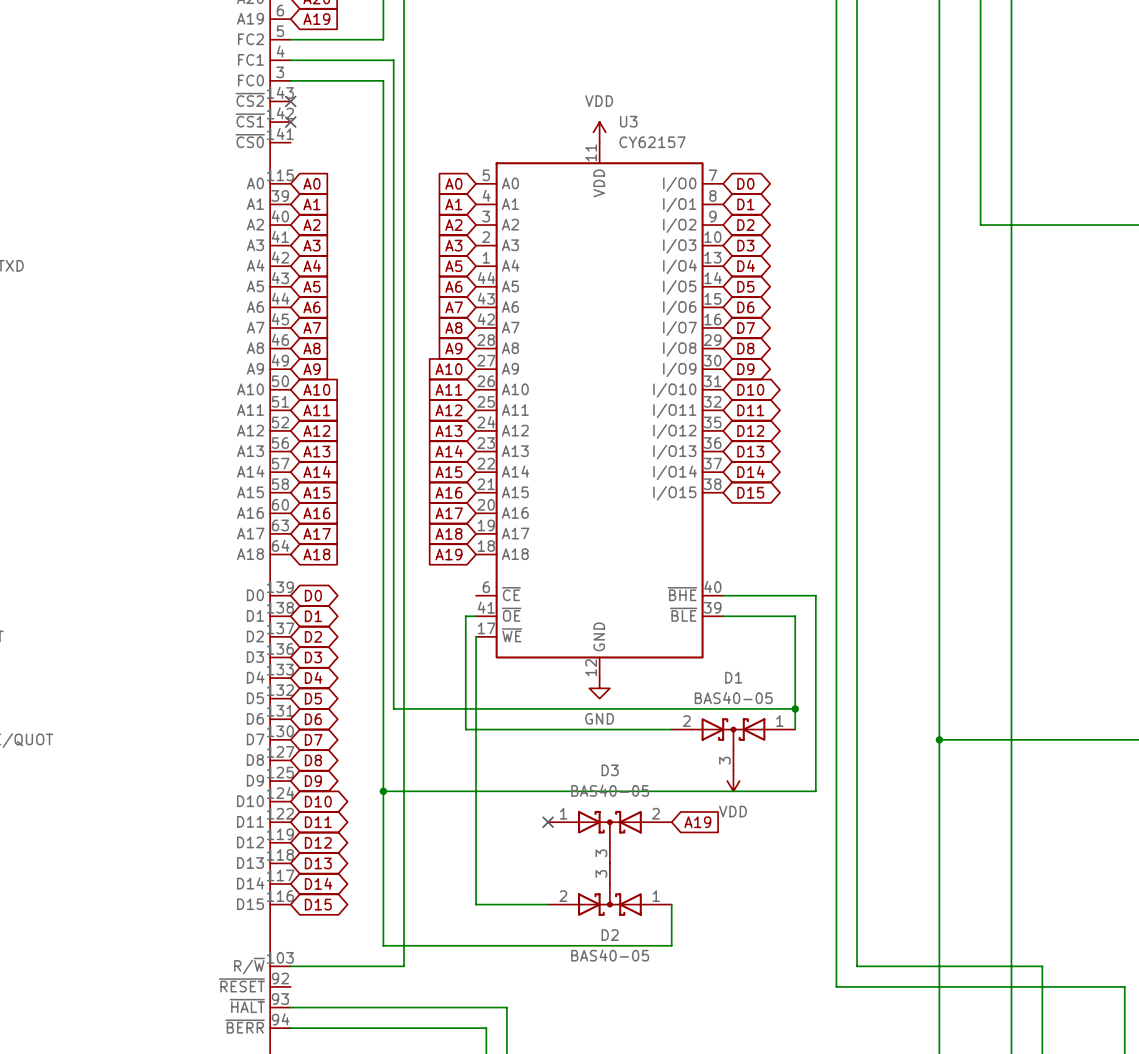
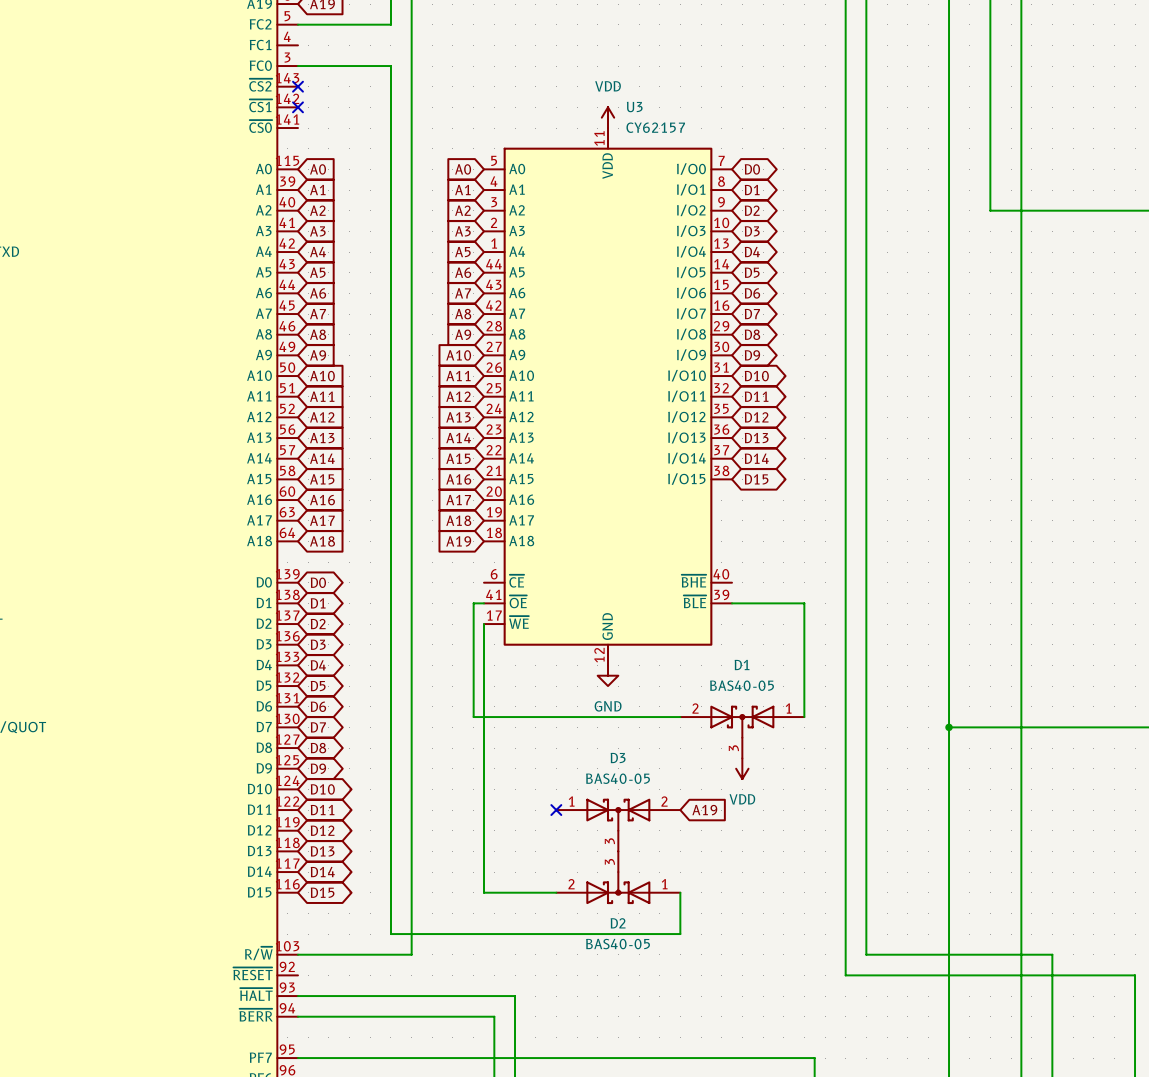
wire: (290, 60) (393, 60) (393, 708) (795, 708) -> none
wire: (723, 595) (815, 595) (815, 791) (383, 791) -> none
junction: (795, 708) -> none
junction: (383, 791) -> none

